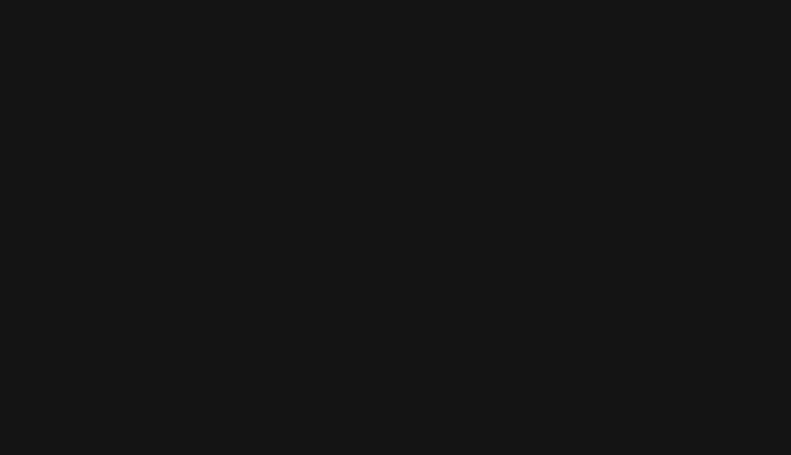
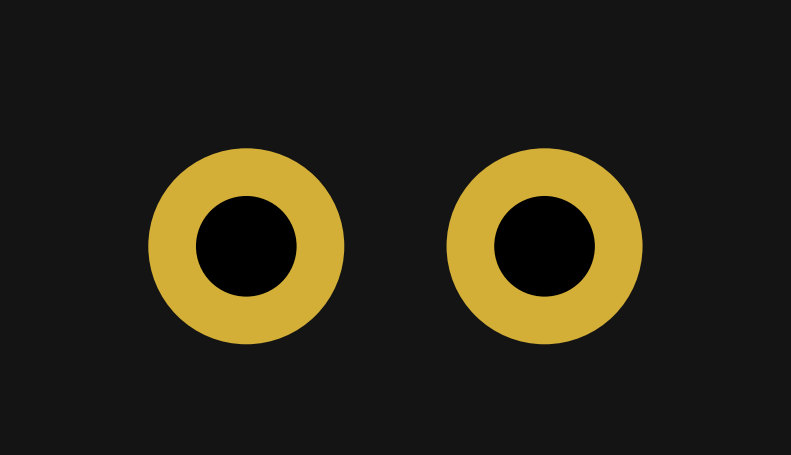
part: none -> (246, 246)
part: none -> (544, 246)

